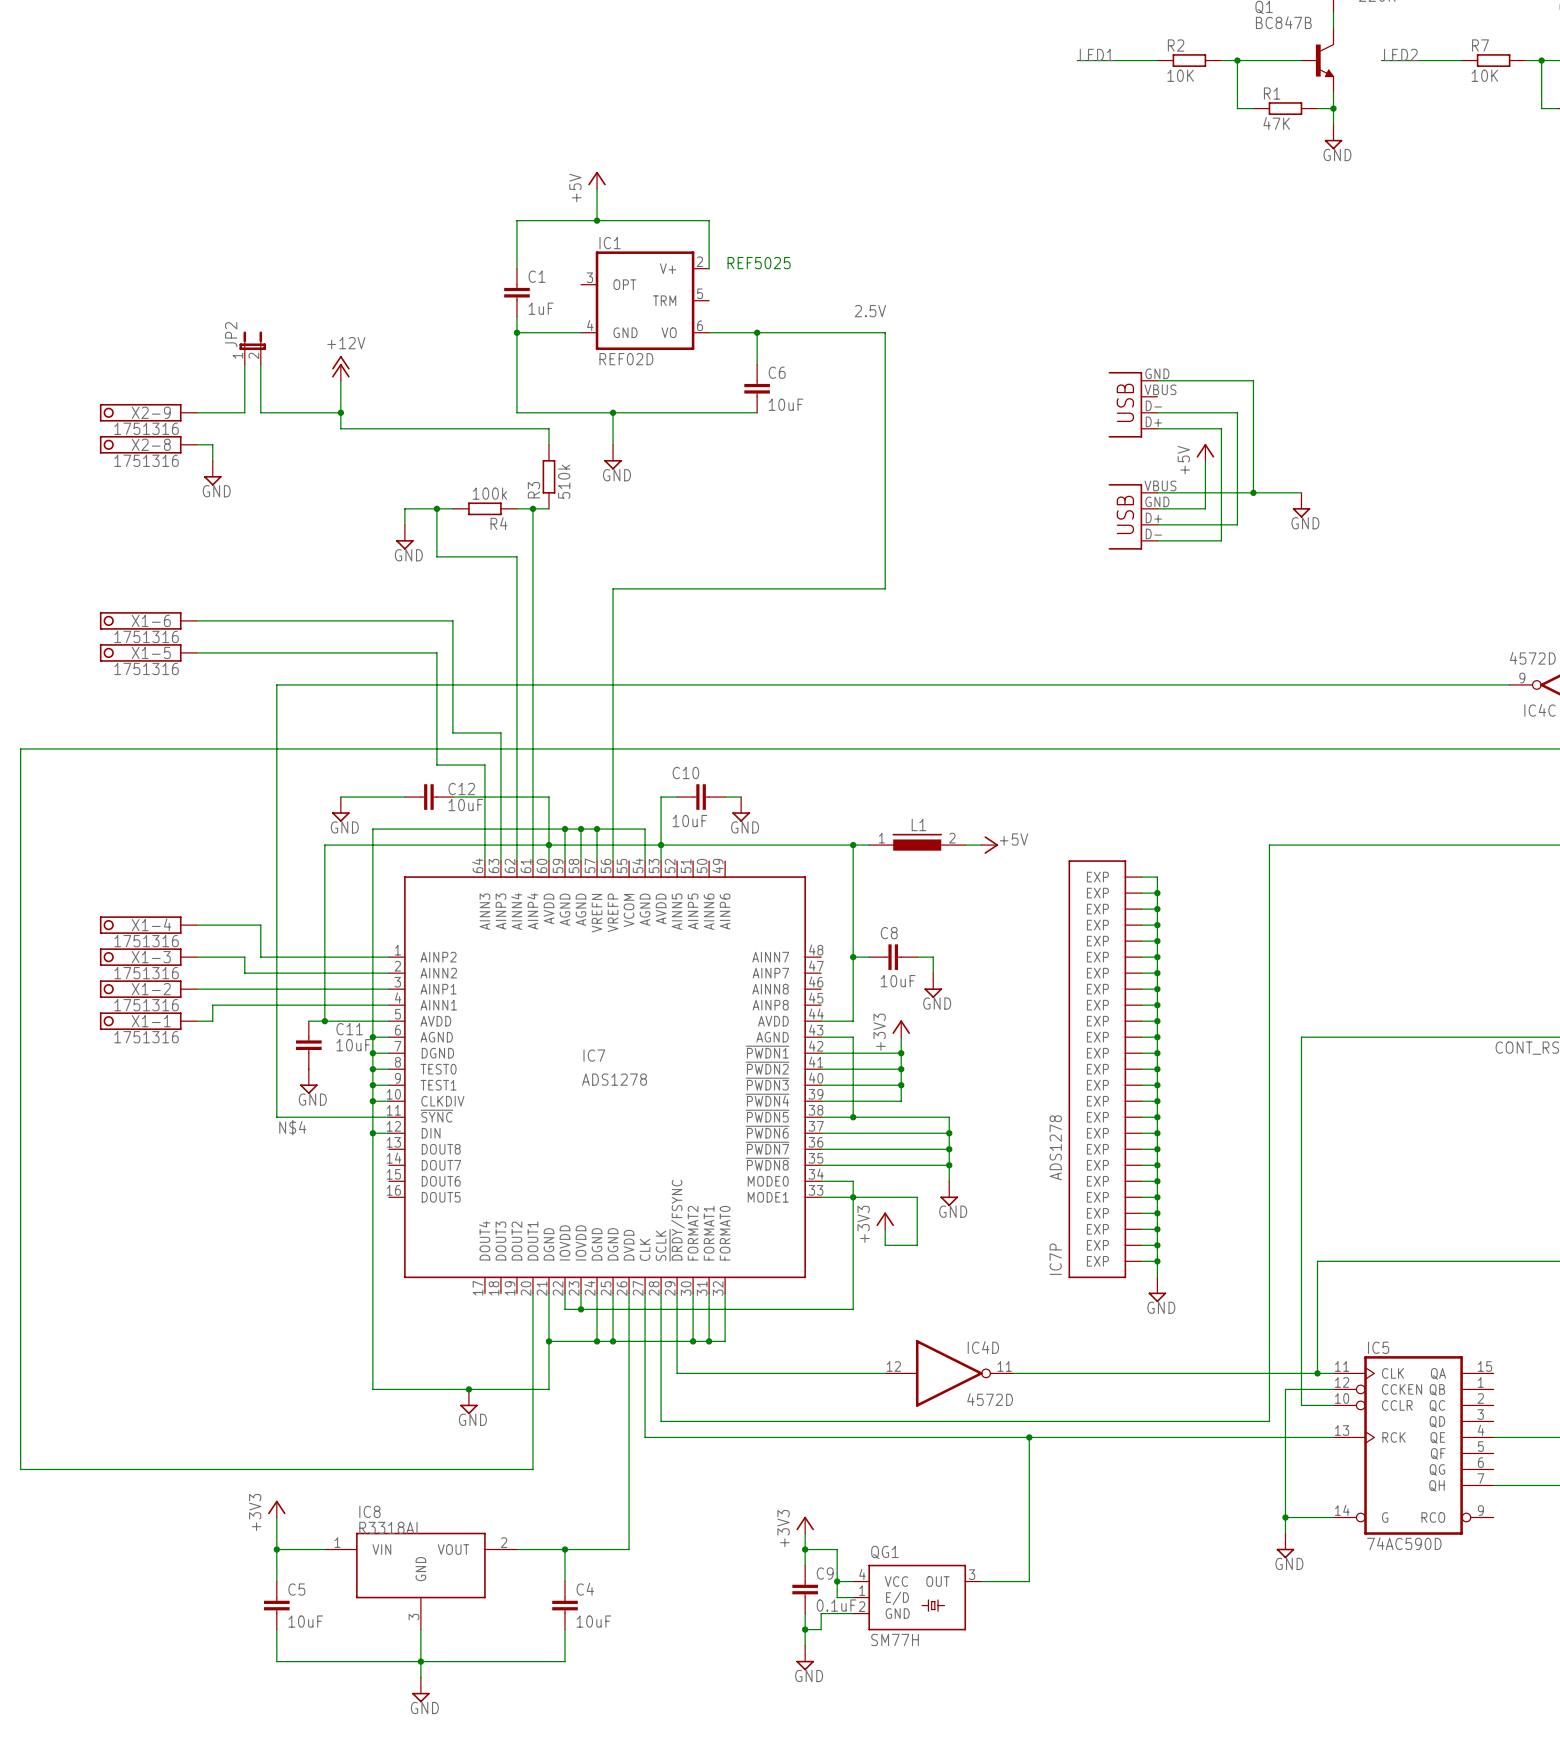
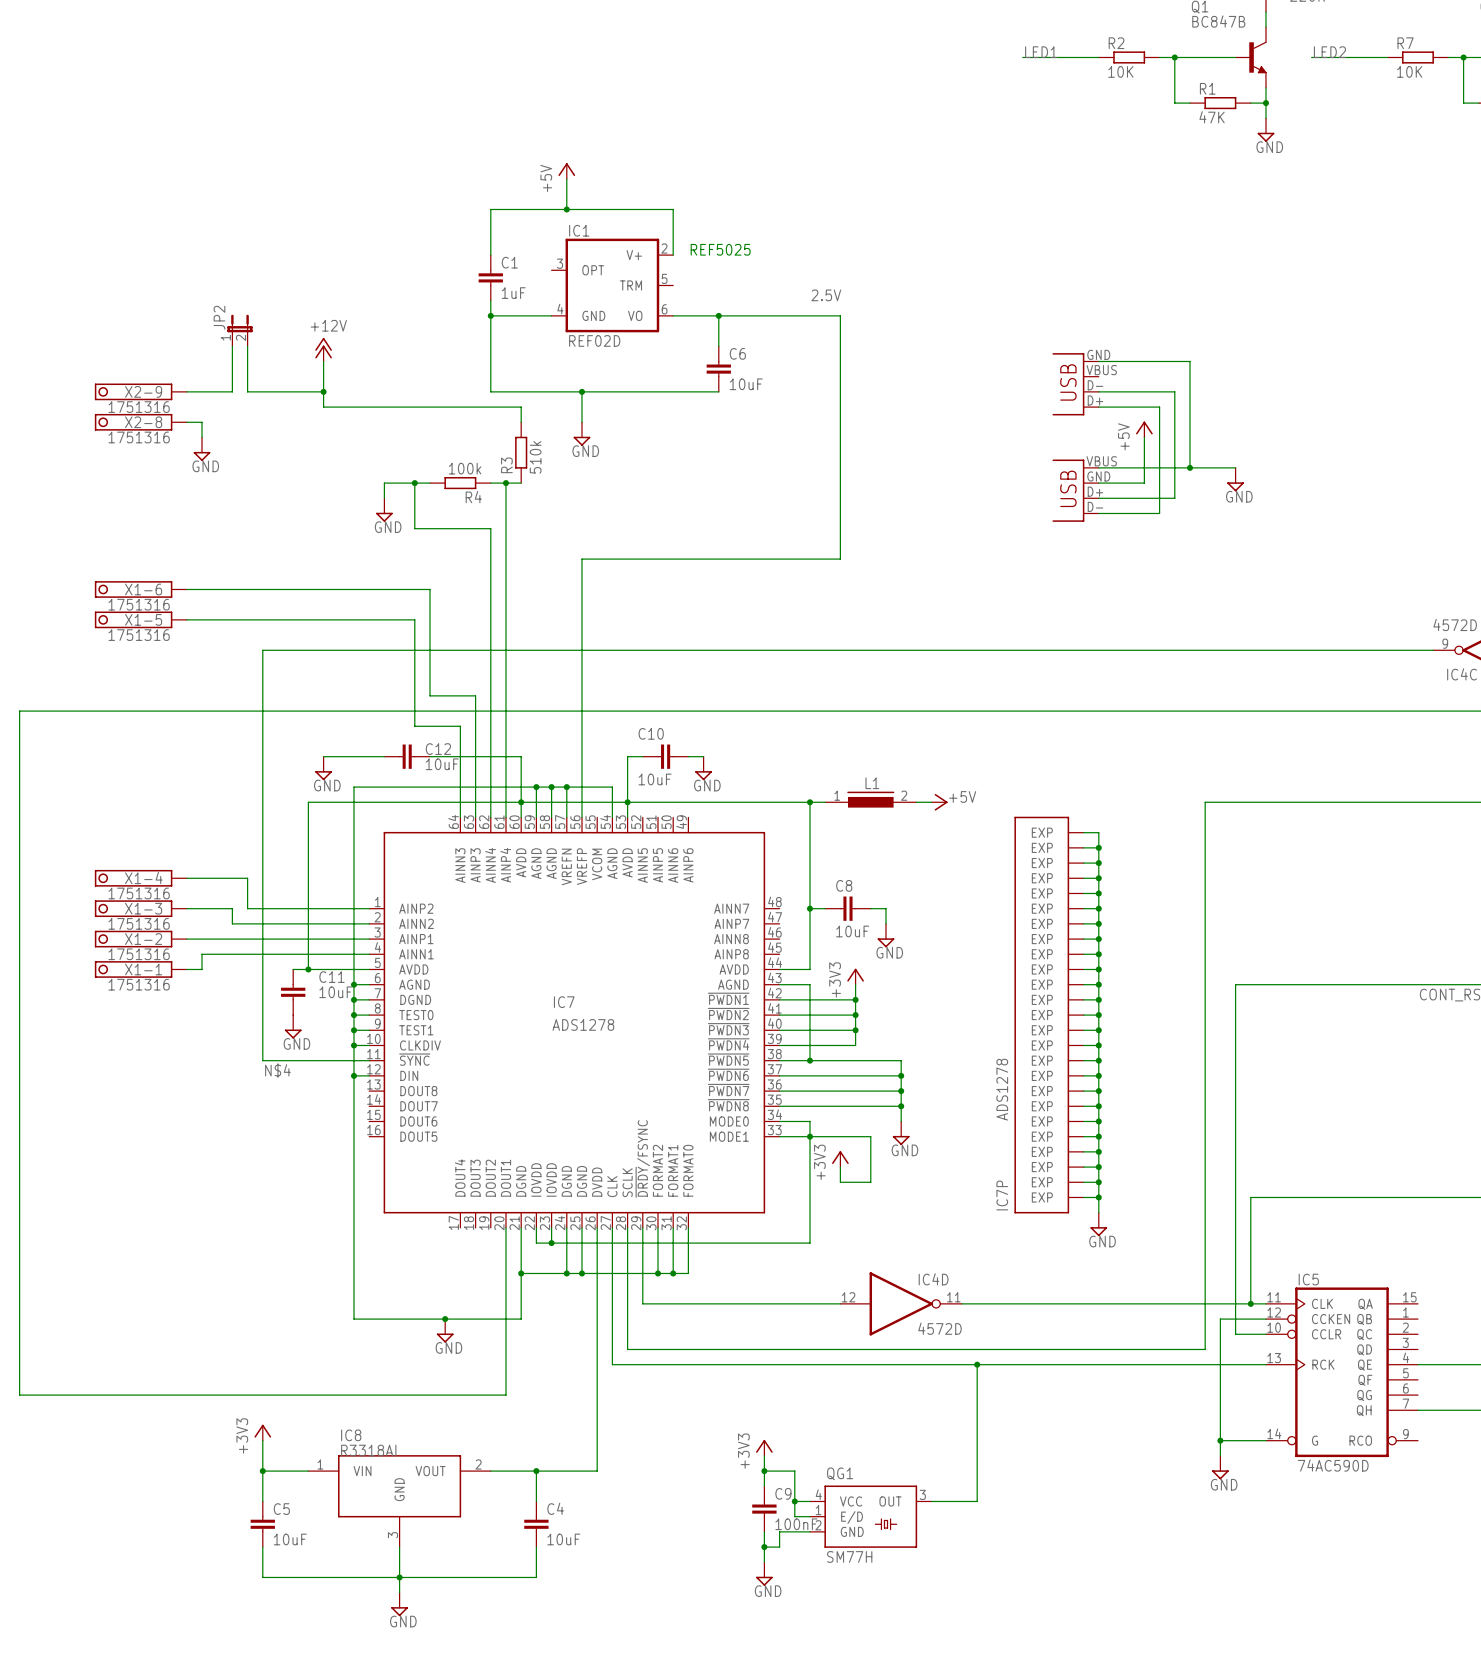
C9 value: 0.1uF (836, 1605) -> 100nF (796, 1524)

